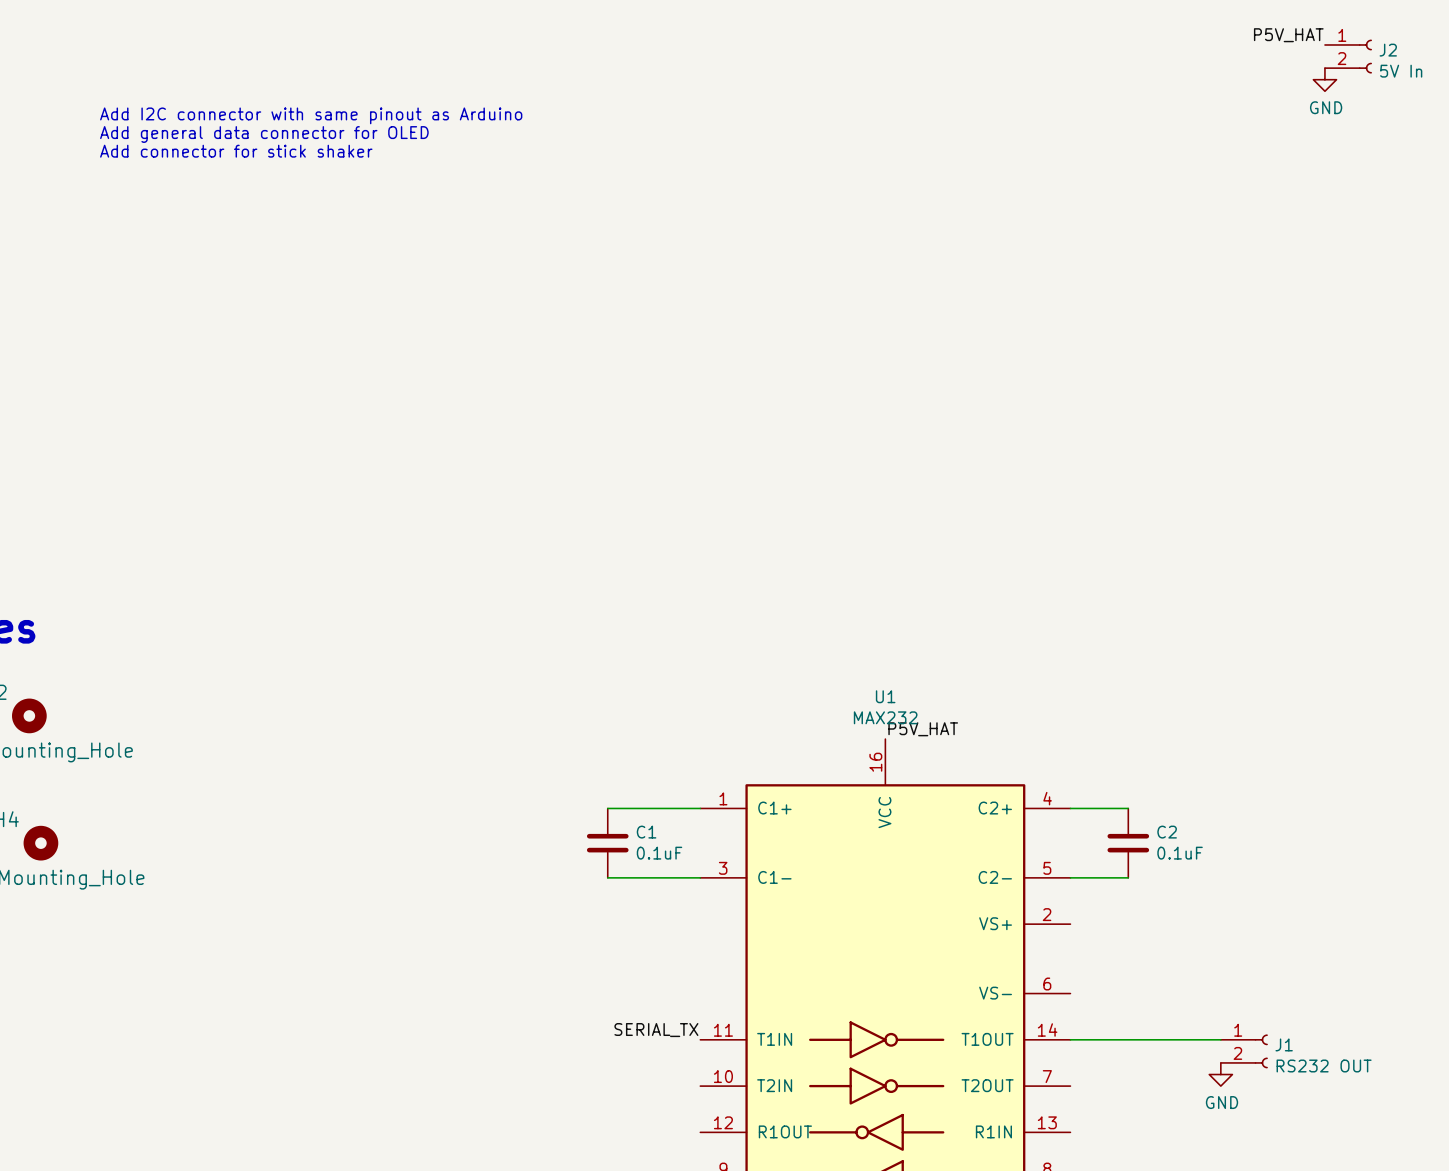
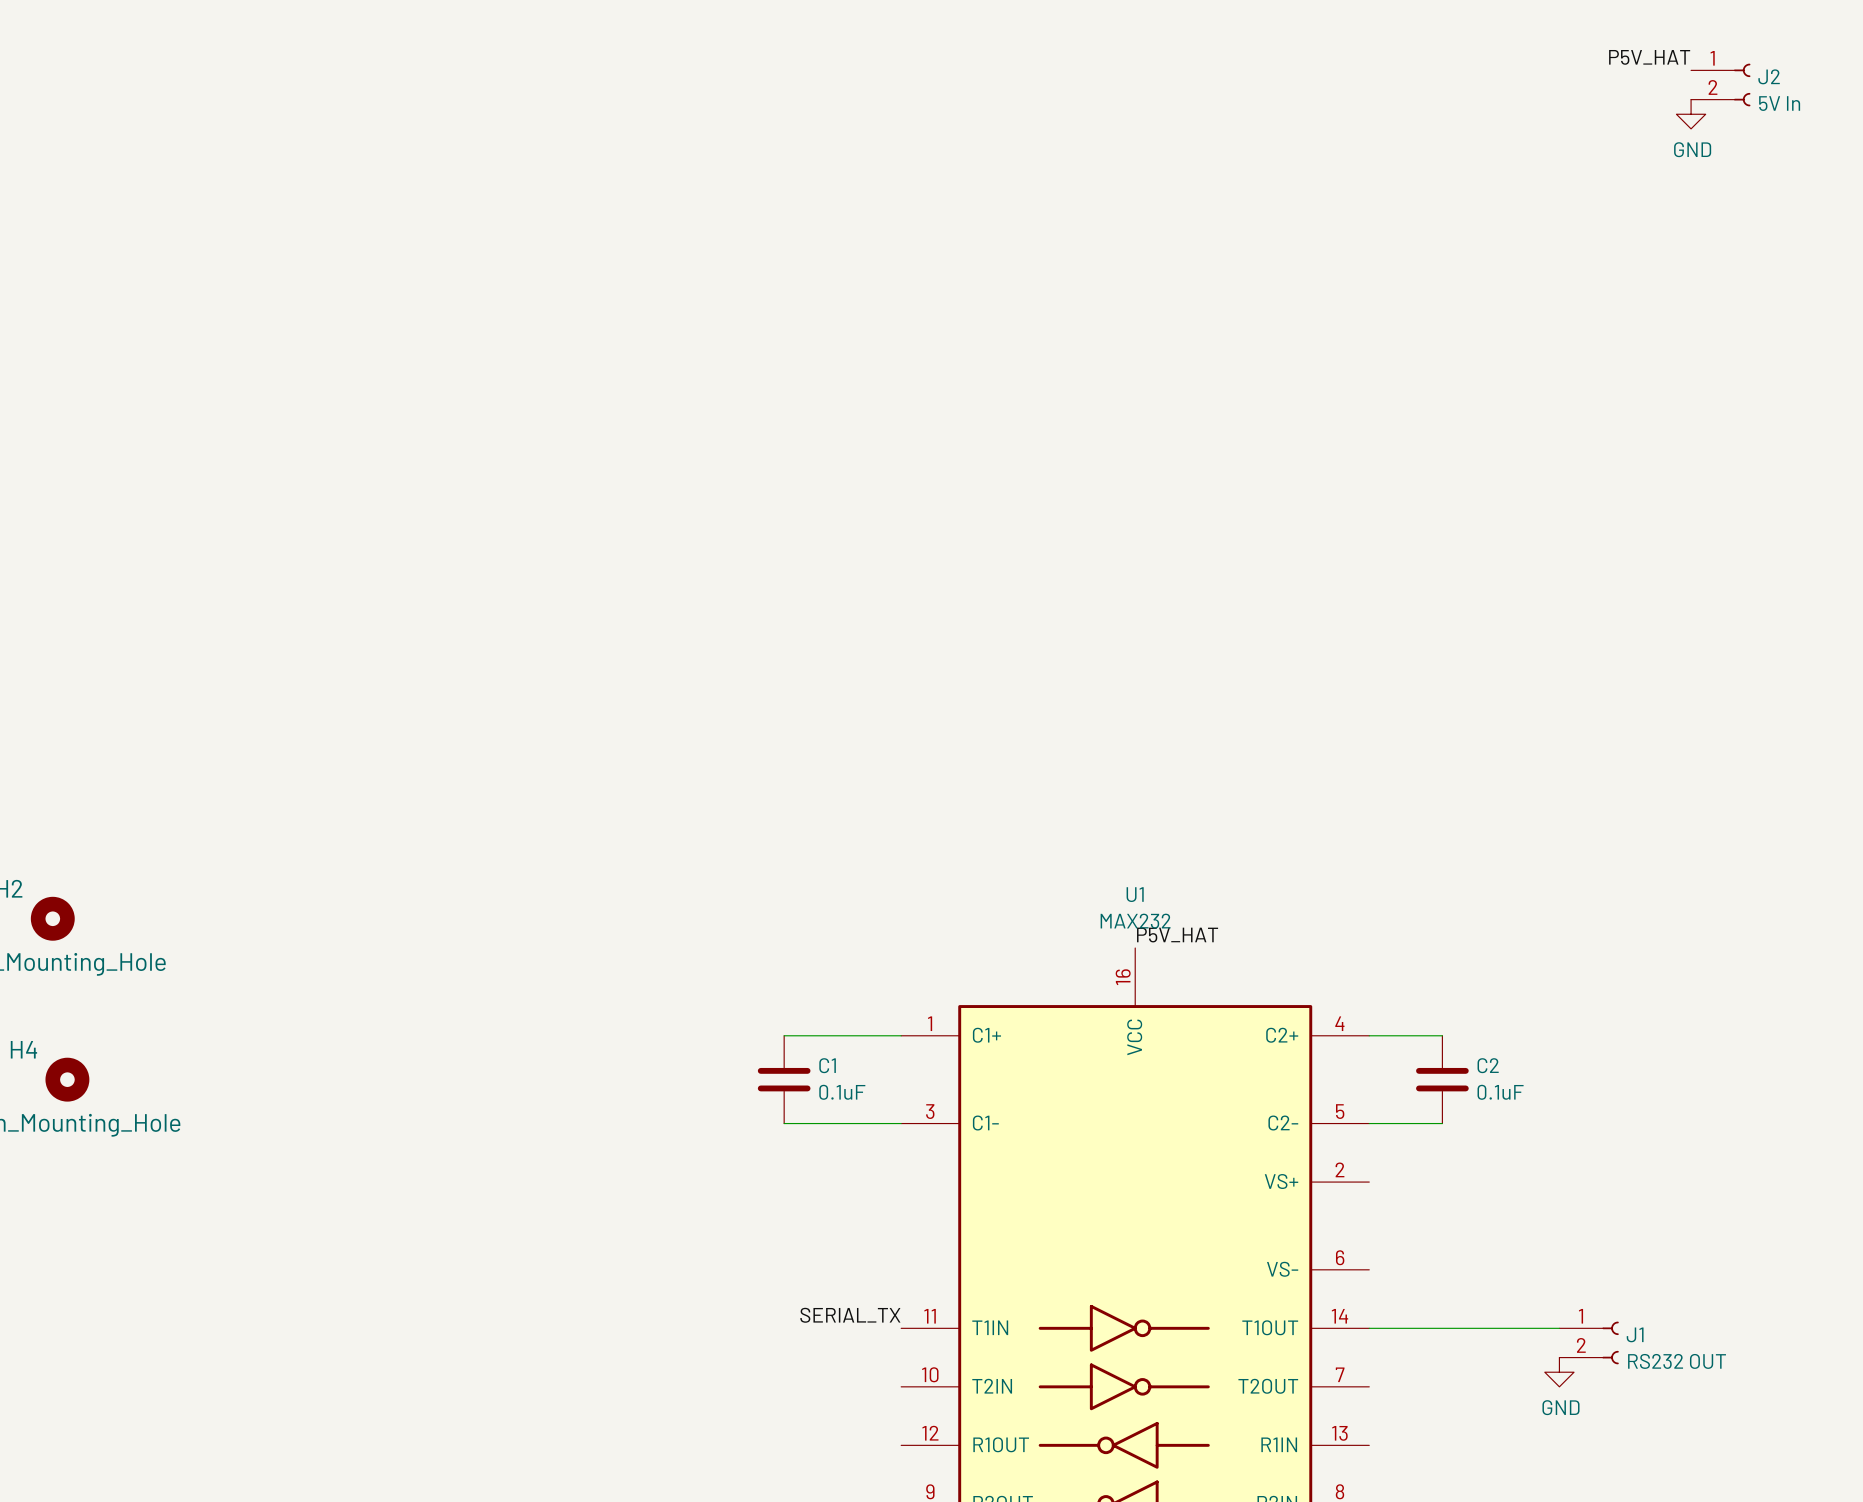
text: Add I2C connector with same pinout as Arduino (311, 115) -> none
text: Add general data connector for OLED (264, 134) -> none
text: Add connector for stick shaker (236, 151) -> none

